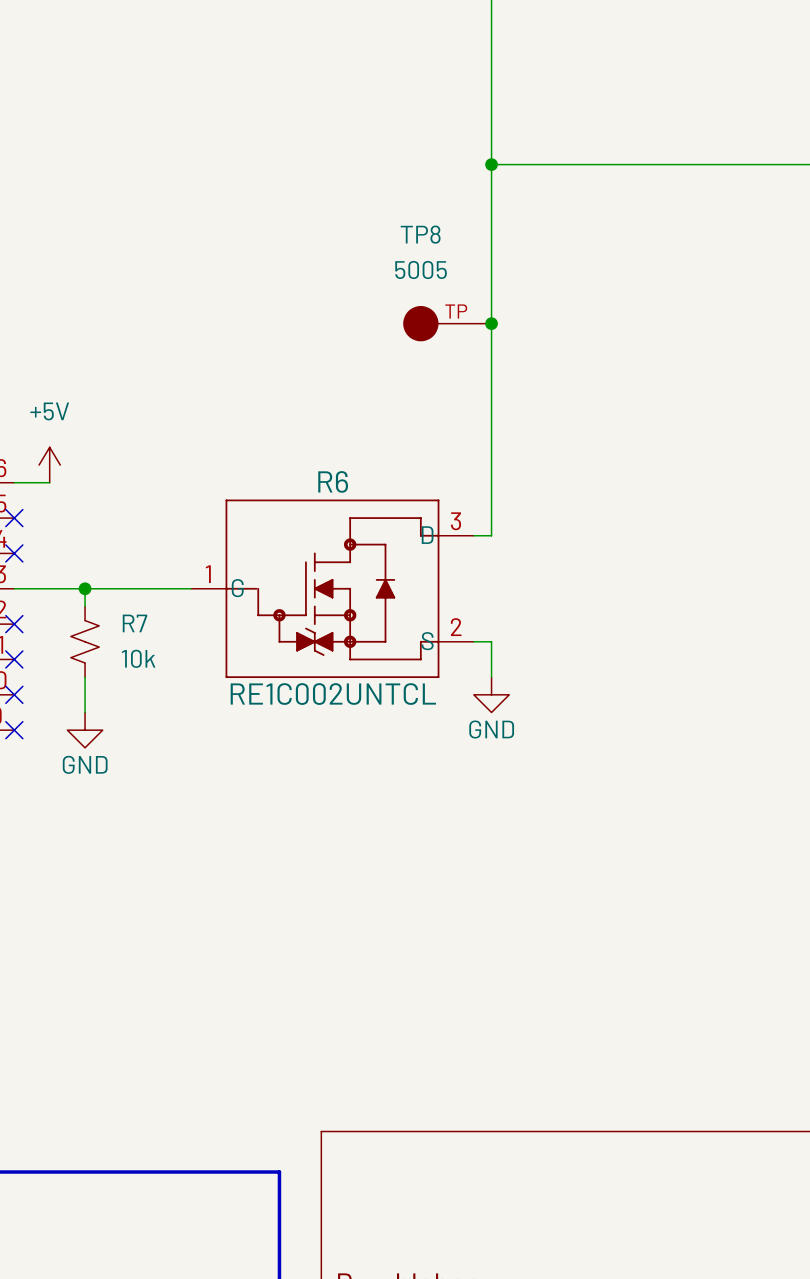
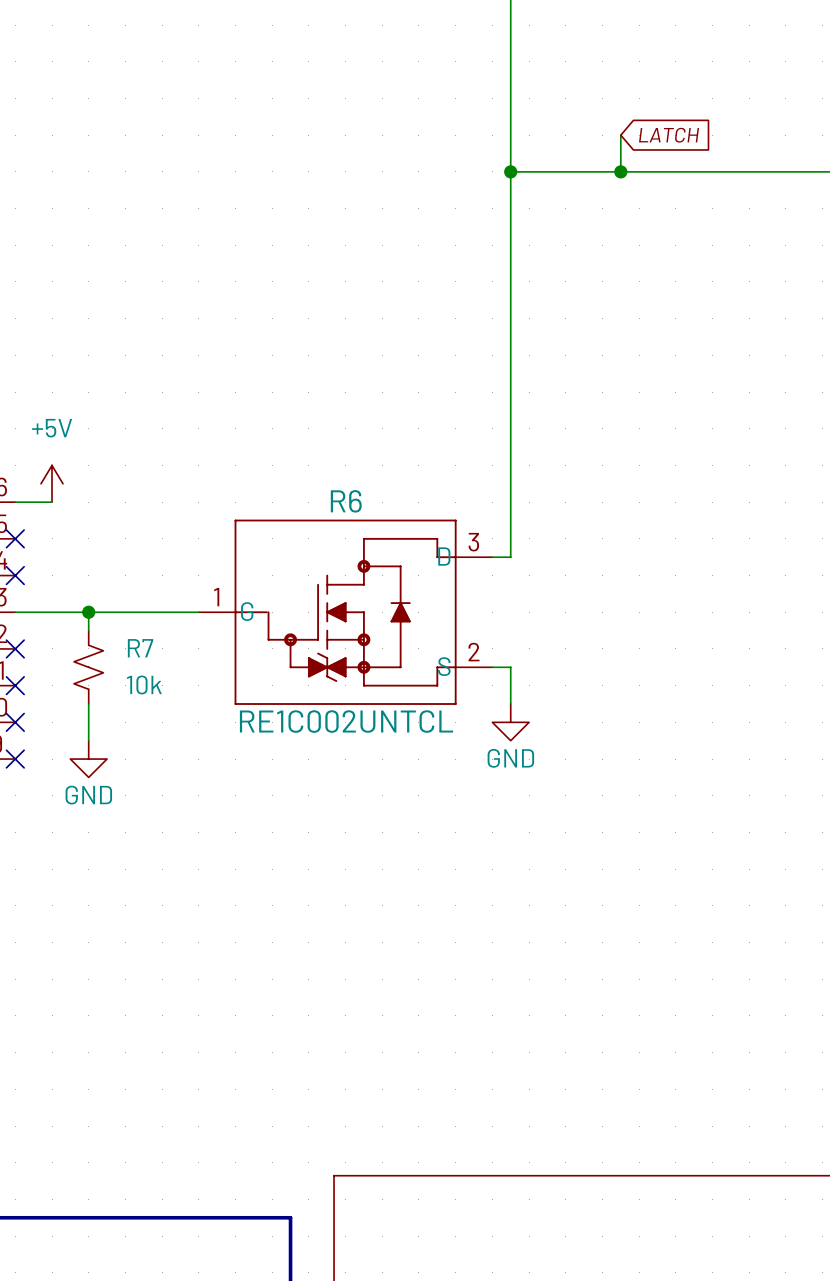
wire: none -> (620, 135) (620, 171)
global label: none -> LATCH (669, 135)
junction: none -> (620, 171)
TP8: 5005 (447, 323) -> none
junction: (491, 323) -> none

